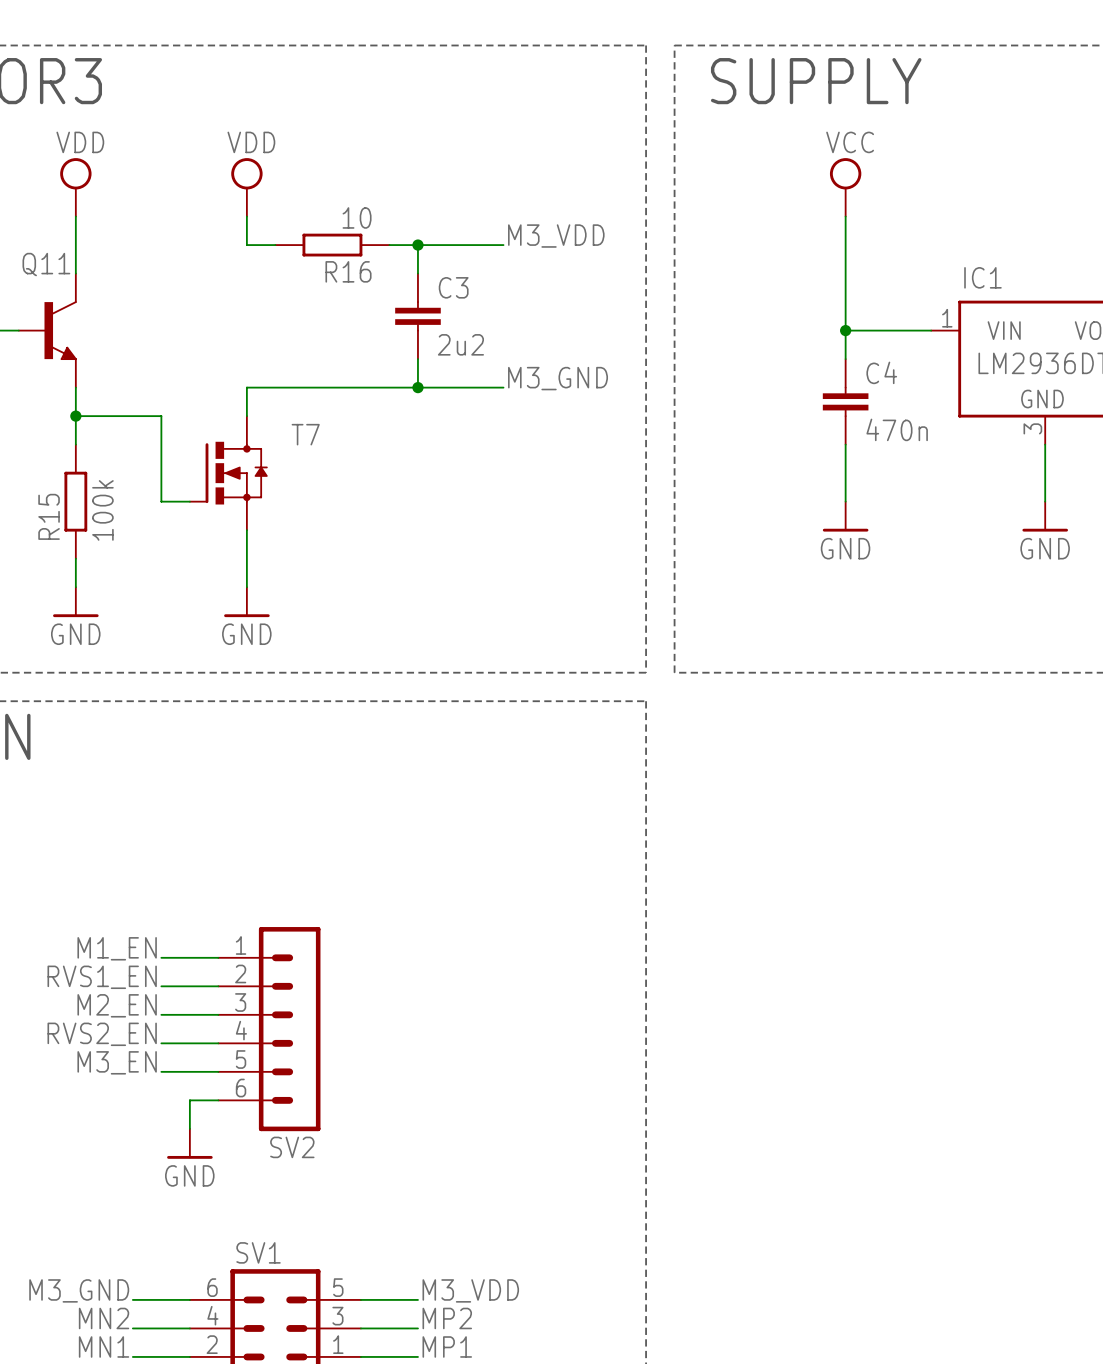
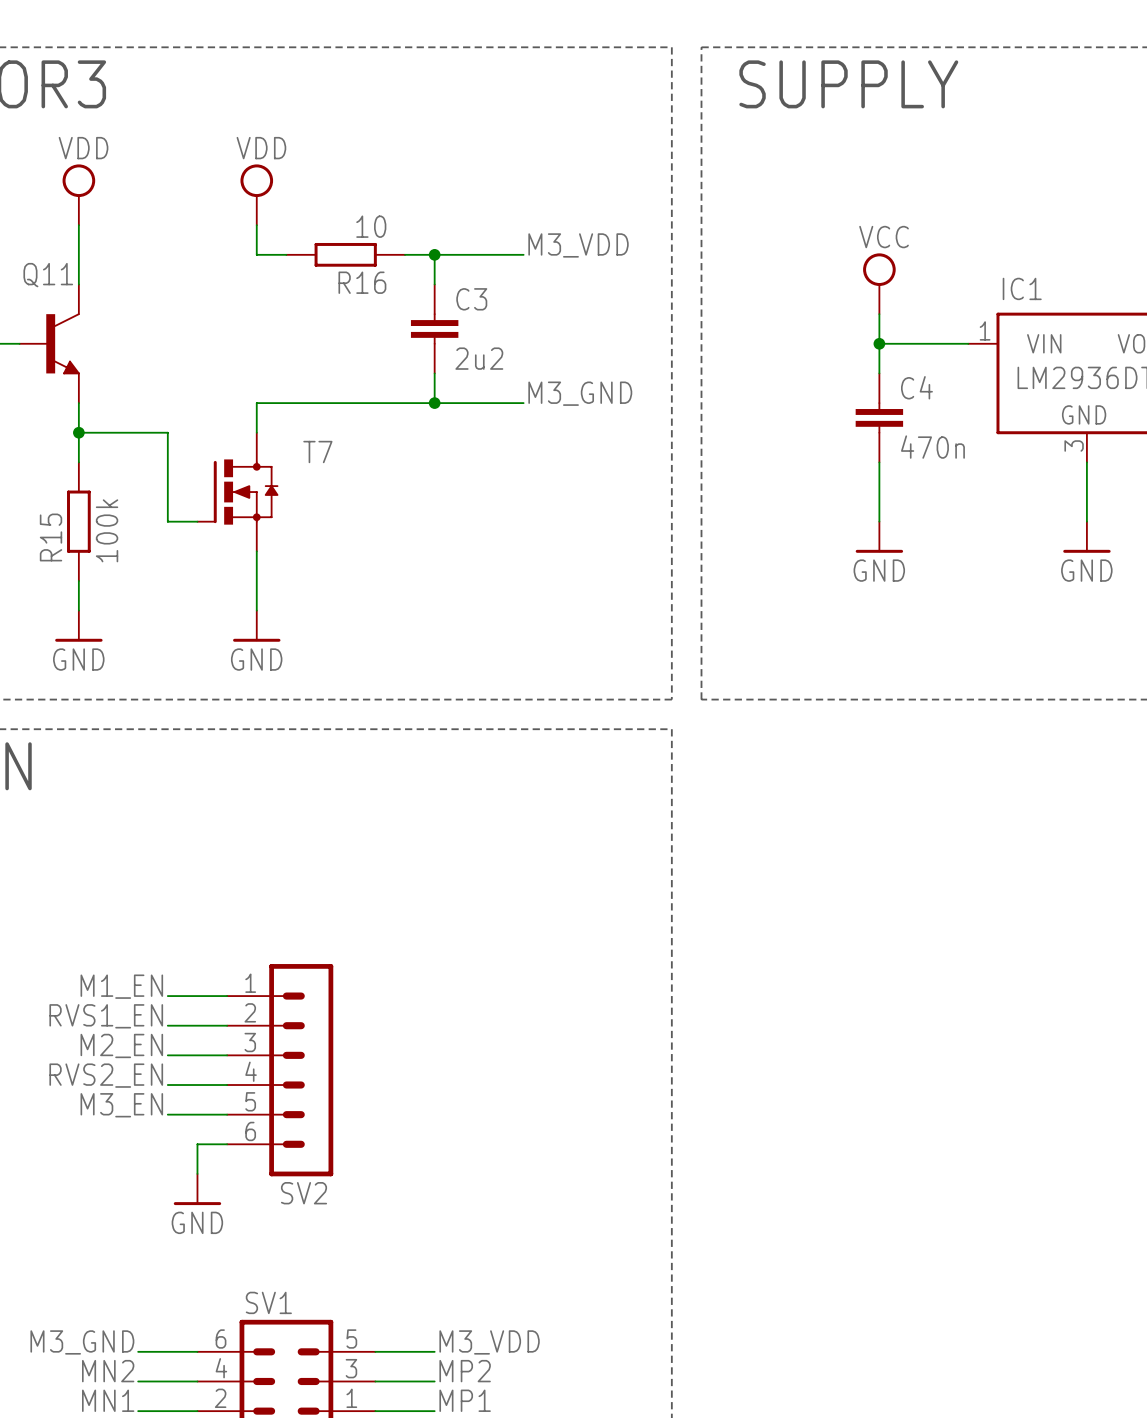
power symbol position: VCC (845, 187) -> VCC (879, 283)
wire: (845, 216) (845, 302) -> none

